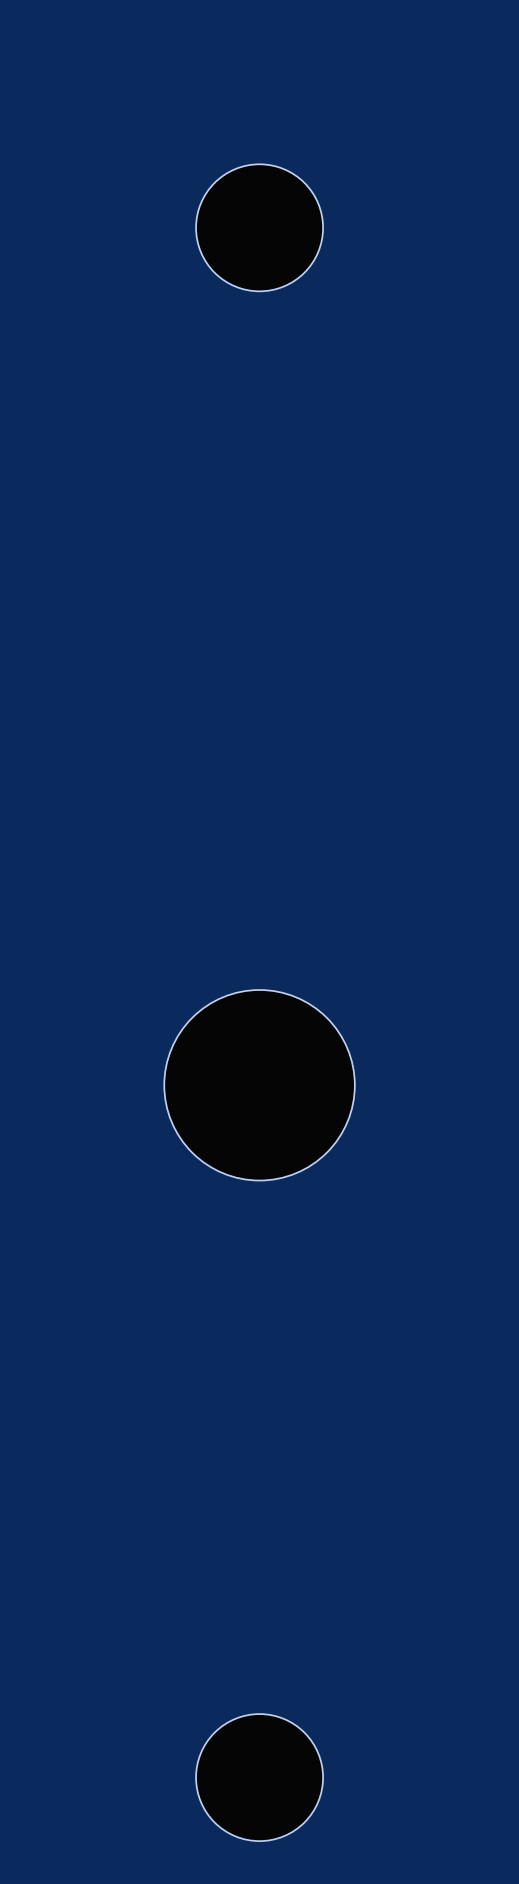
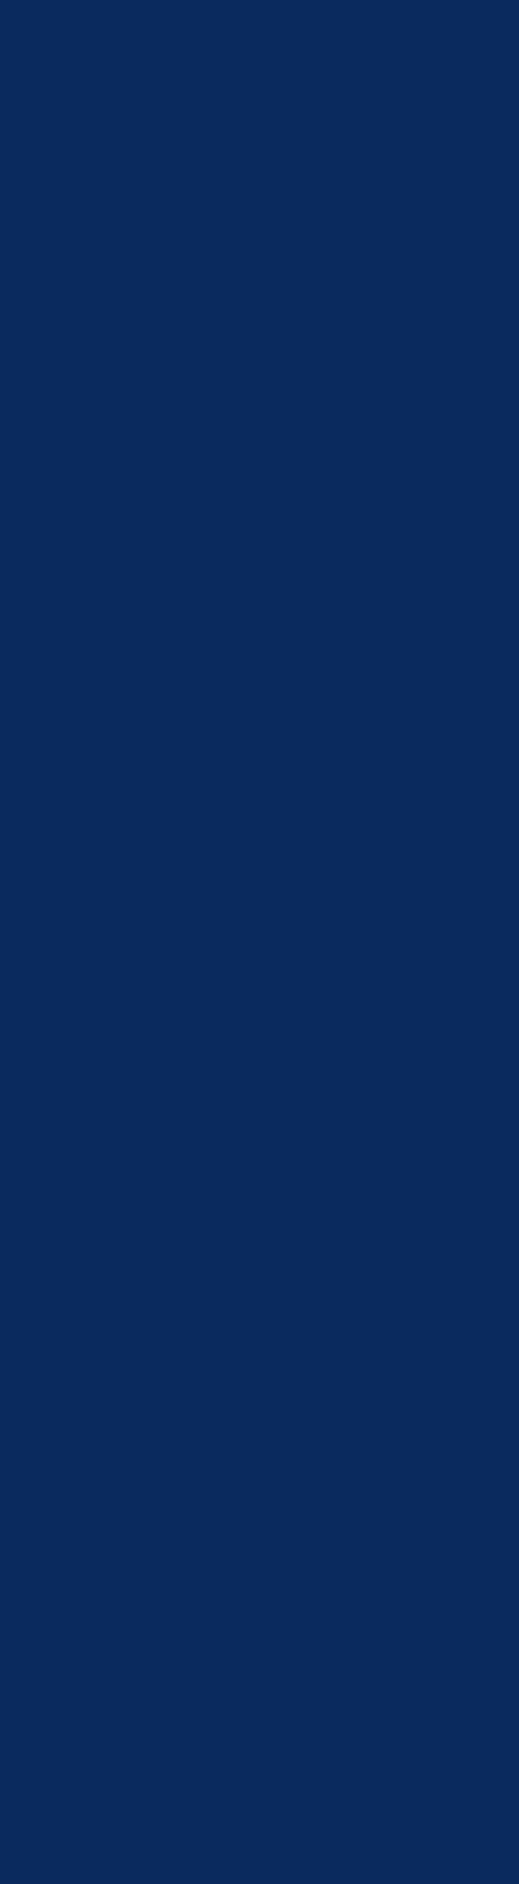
part: (259, 227) -> none
part: (259, 1085) -> none
part: (259, 1777) -> none

